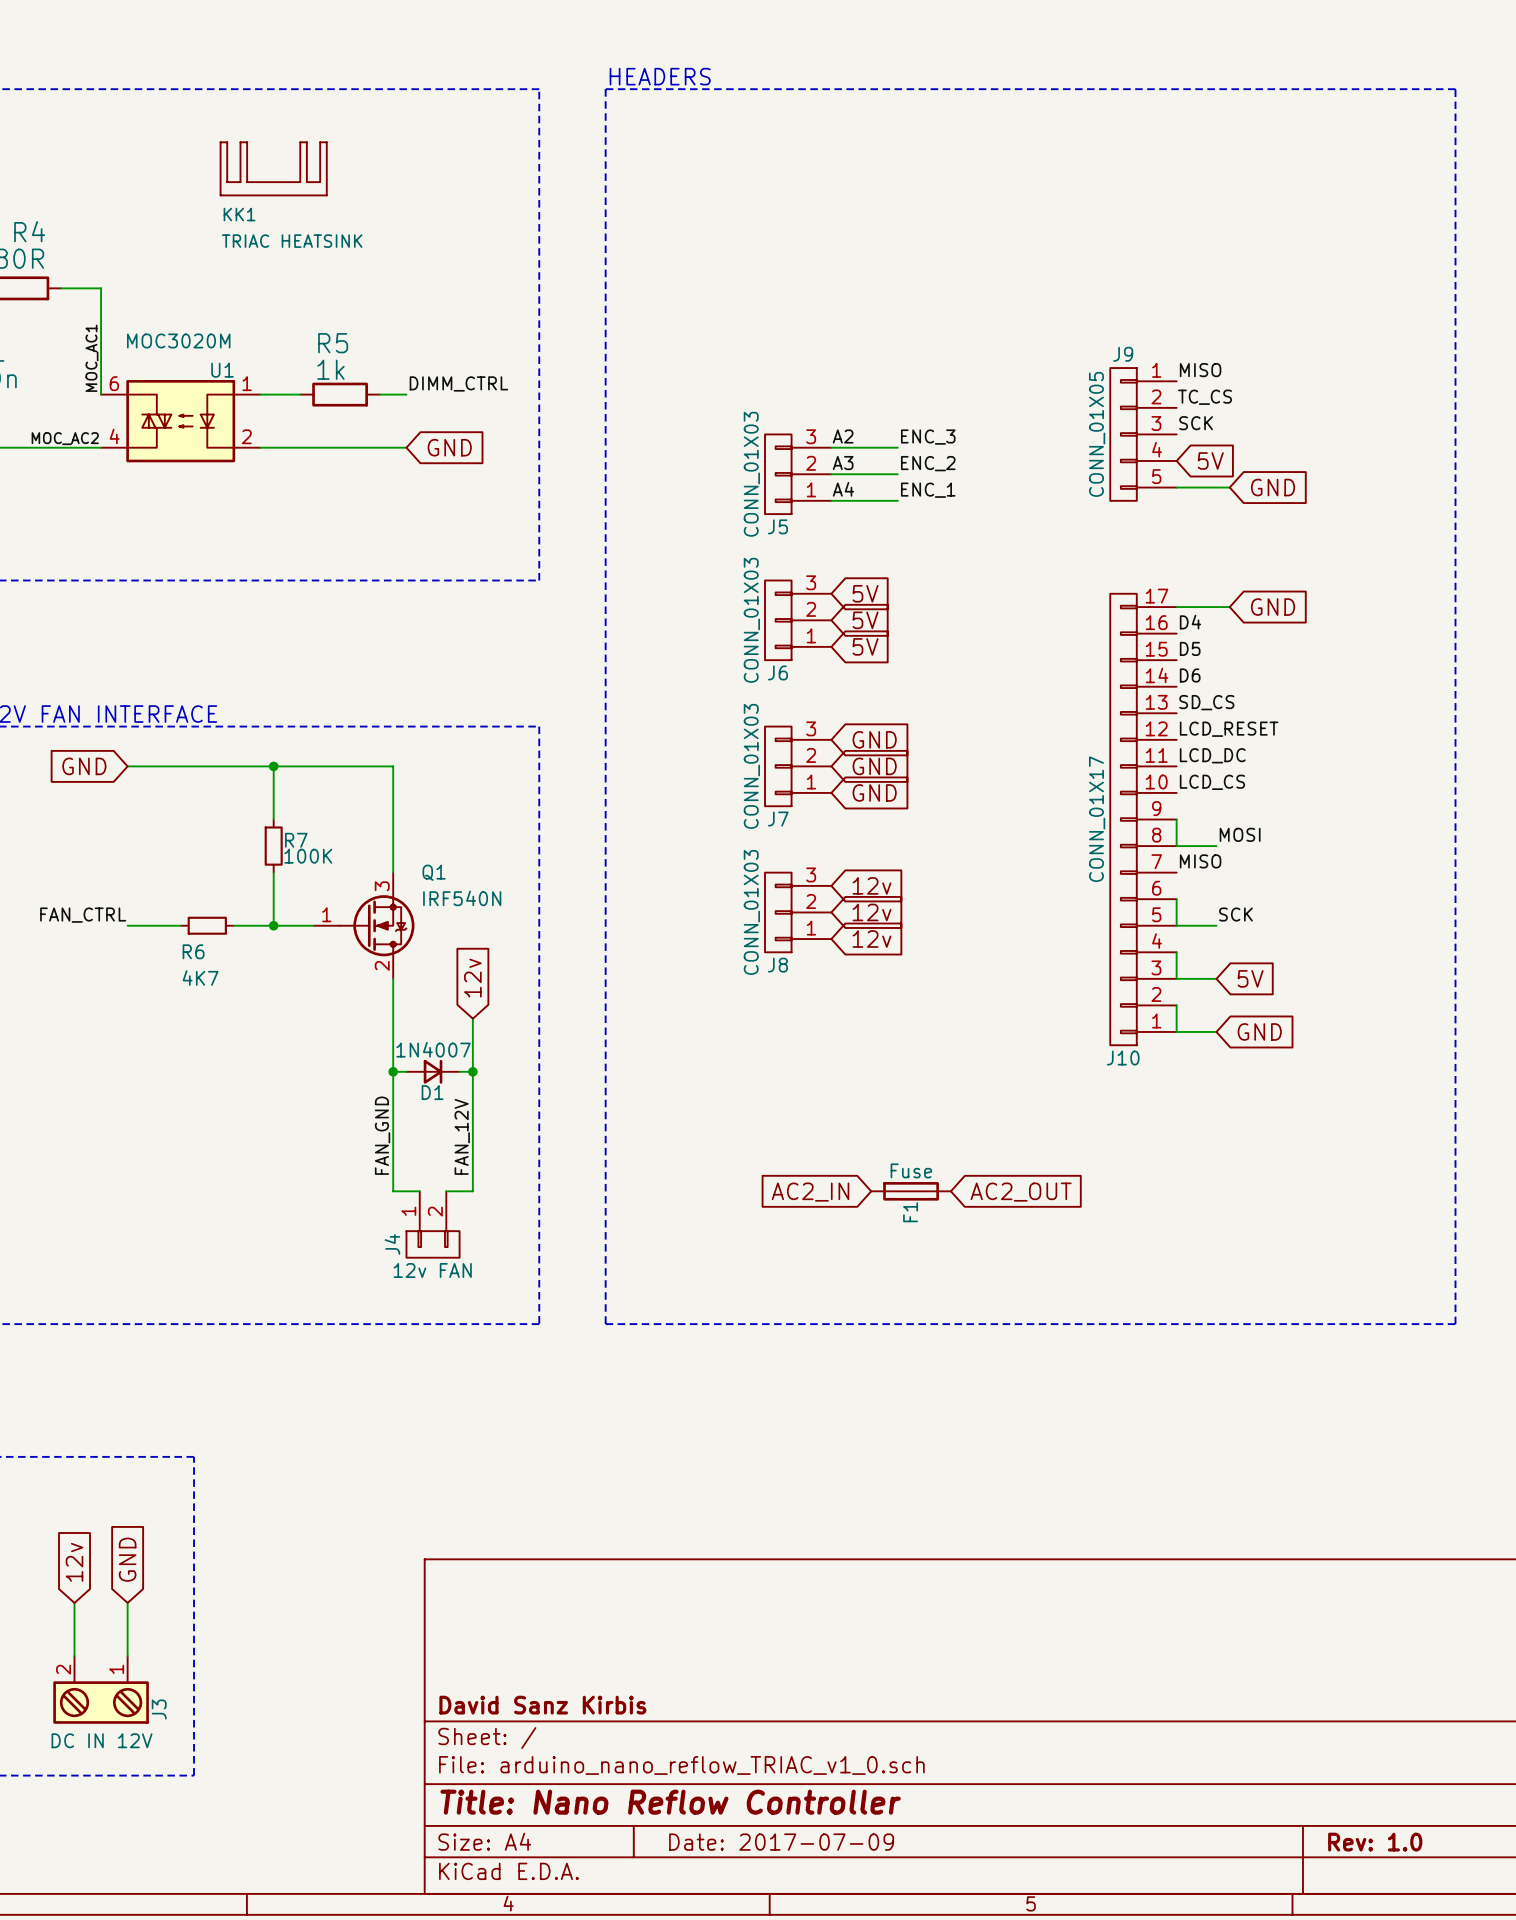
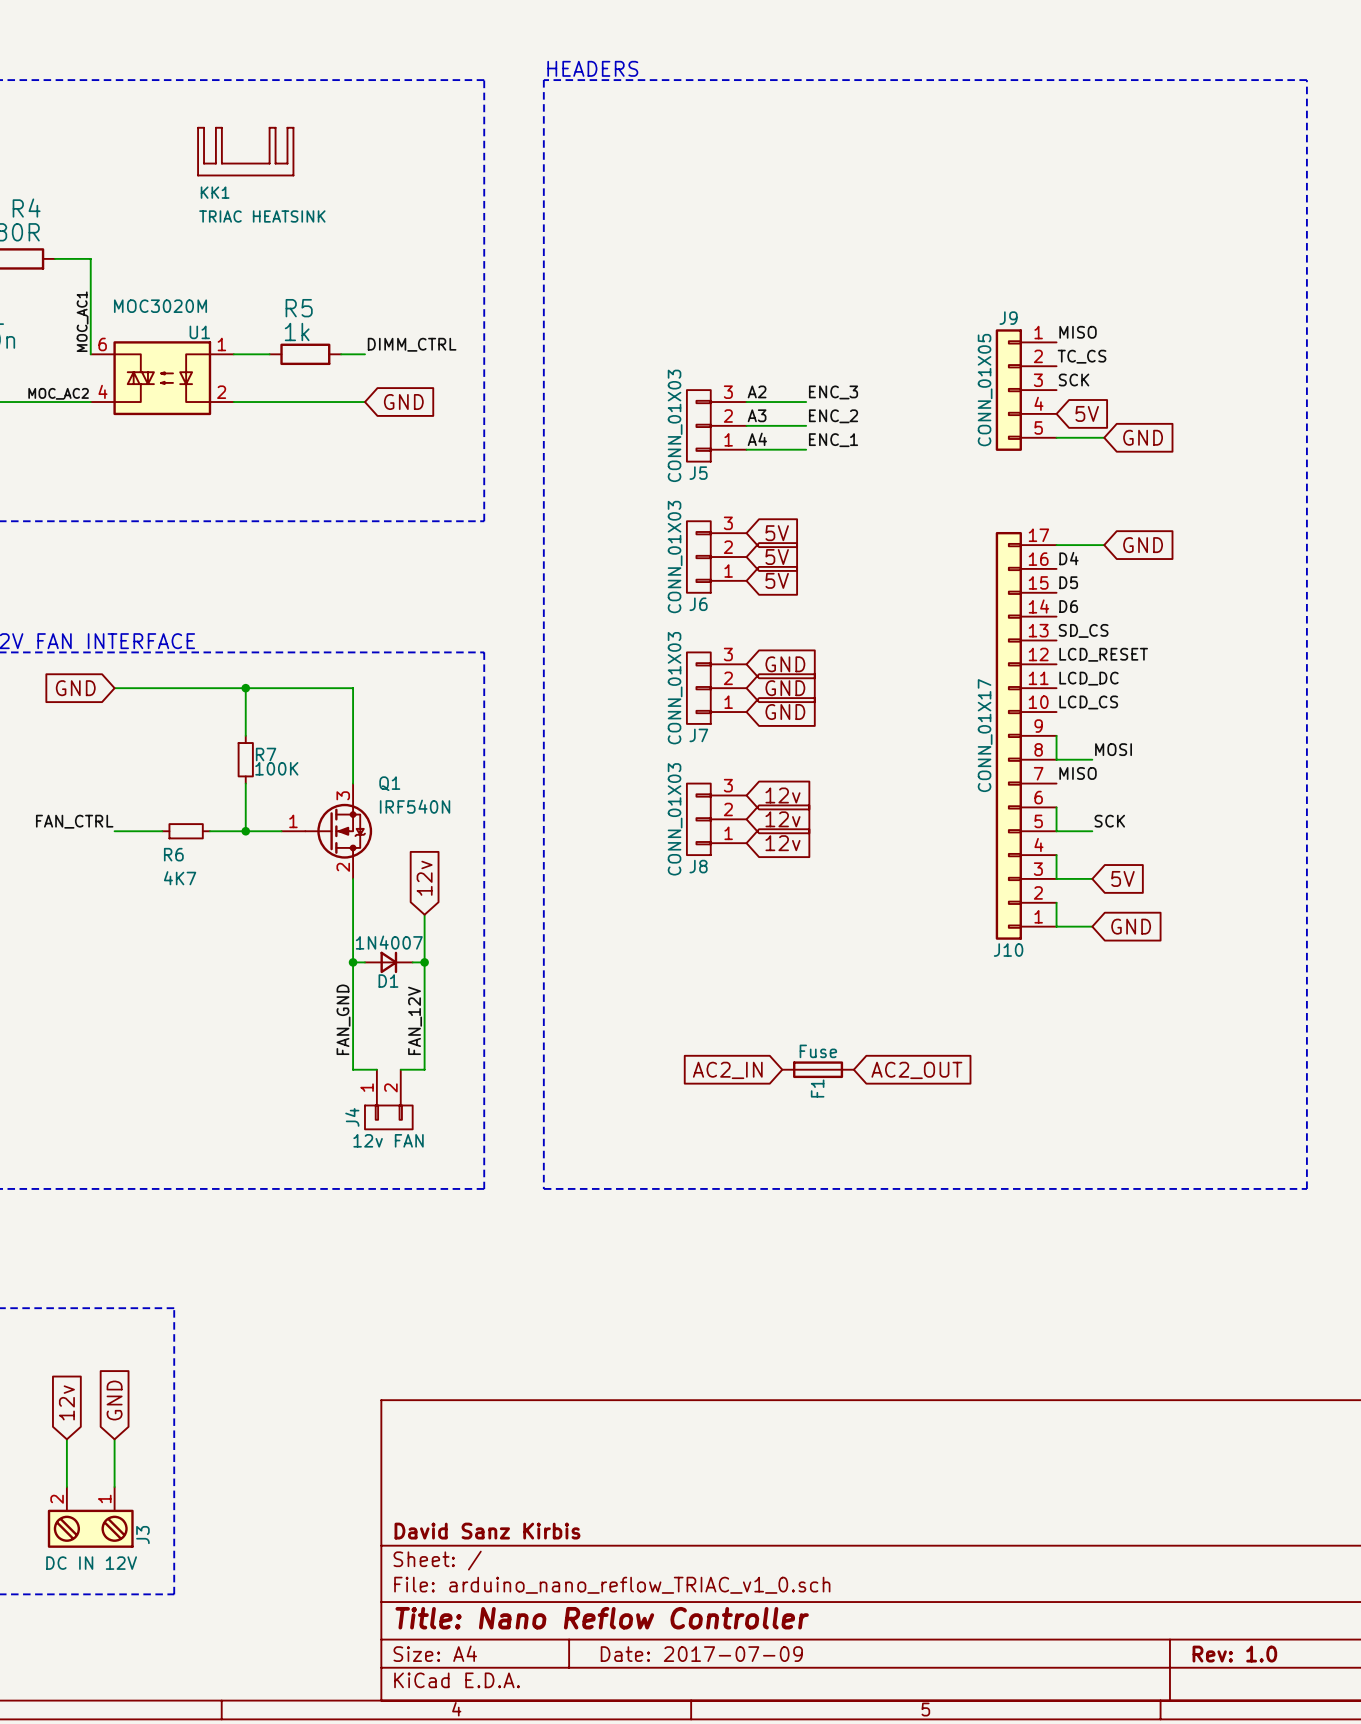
J9 symbol: [1110, 368, 1177, 501] -> [995, 329, 1057, 451]
J10 symbol: [1110, 593, 1177, 1046] -> [995, 531, 1057, 940]

